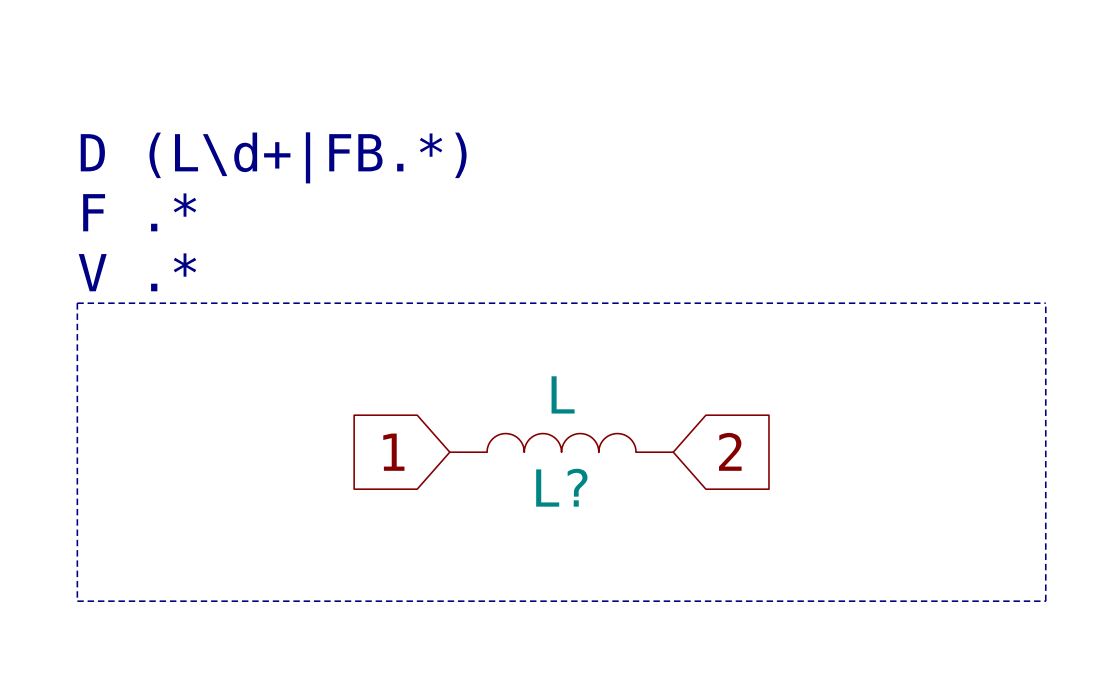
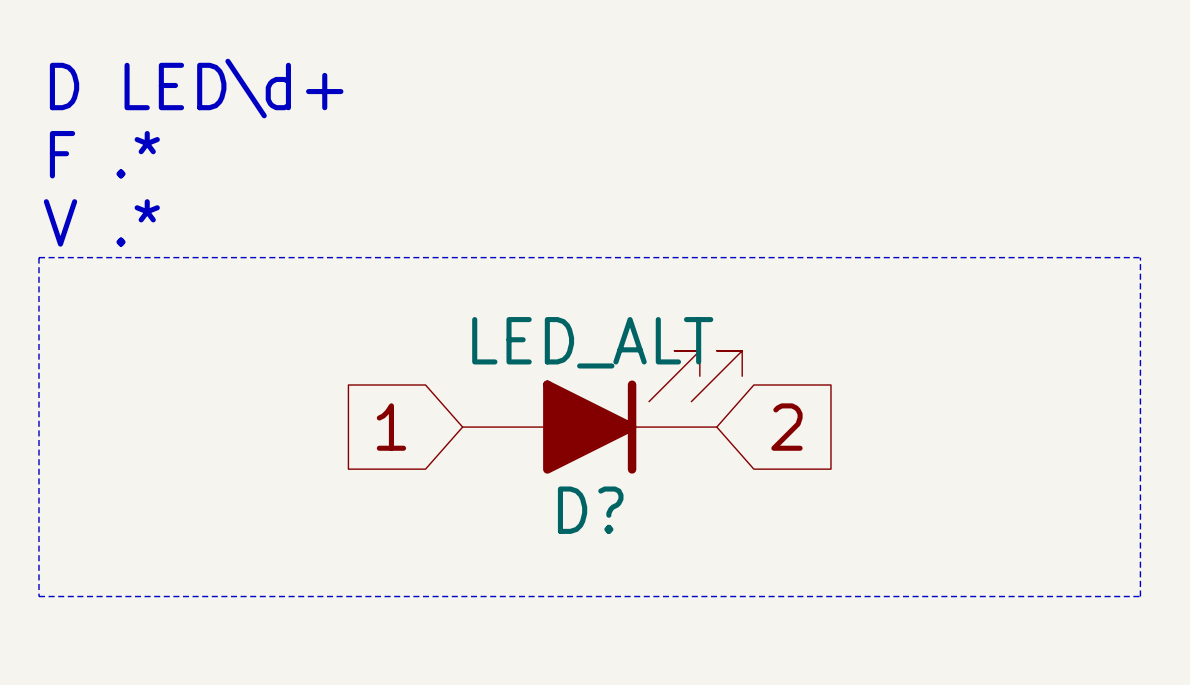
text: D (L\d+|FB.*) (273, 157) -> D LED\d+ (196, 88)
D?: none -> LED_ALT (602, 412)
L?: L (561, 442) -> none

